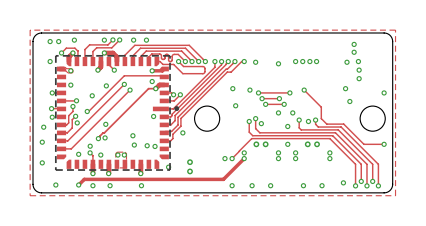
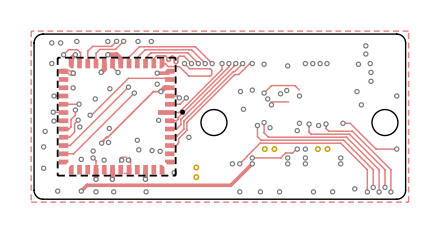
via: none -> (252, 90)
via: none -> (286, 90)
track: none -> (299, 90) (294, 85) (271, 85) (264, 93)
via: (249, 90) -> none
via: none -> (264, 93)
via: none -> (280, 93)
track: (304, 90) (321, 107) (321, 118) (326, 124) (343, 124) -> (342, 123) (350, 123) (355, 128)
via: (304, 90) -> none
track: (258, 92) (289, 92) -> none
via: (258, 92) -> none
via: none -> (267, 98)
via: (262, 98) -> none
via: (279, 98) -> none
via: none -> (271, 104)
track: (265, 104) (284, 104) -> none
via: (265, 104) -> none
via: (284, 104) -> none
via: (278, 112) -> none
via: (292, 112) -> none
via: none -> (299, 123)
via: none -> (342, 123)
track: none -> (296, 149) (292, 152) (285, 152) (280, 157) (252, 157)
via: none -> (305, 149)

